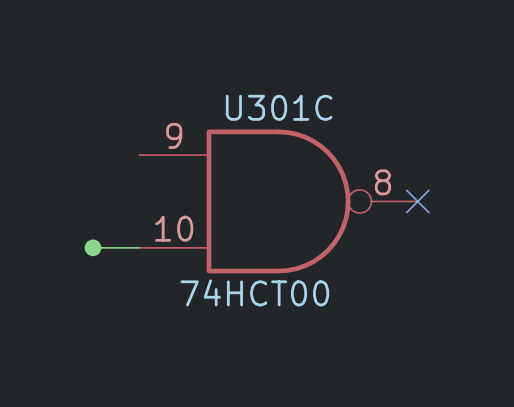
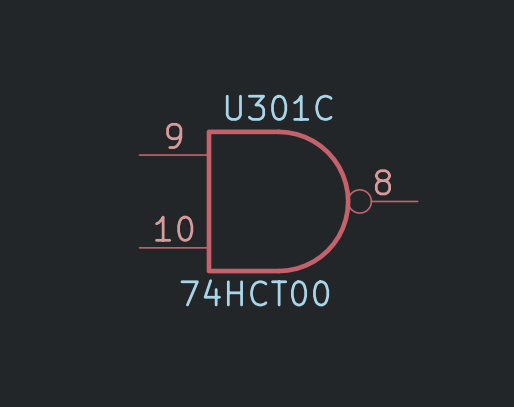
no-connect mark: (417, 201) -> none
wire: (93, 247) (139, 247) -> none
junction: (93, 247) -> none

